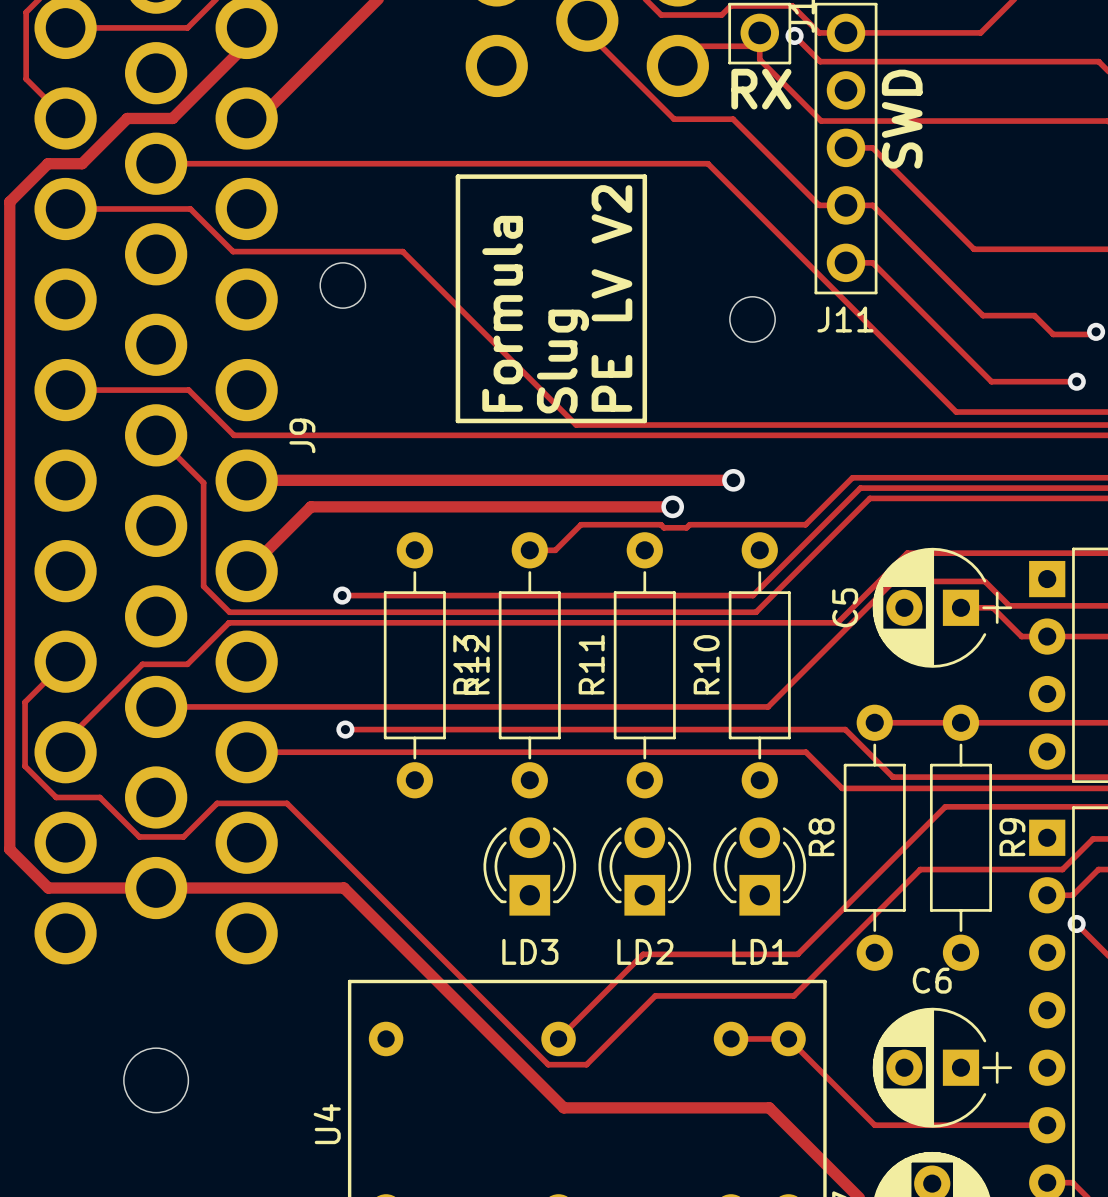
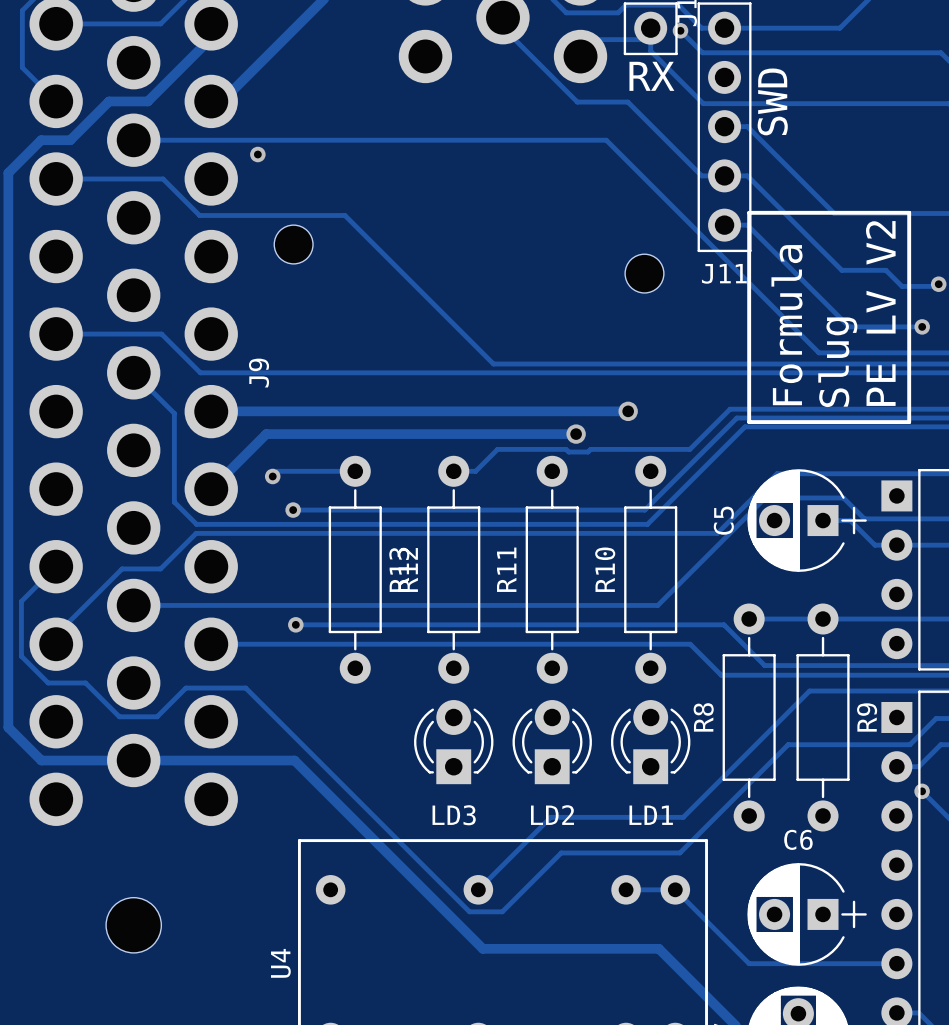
line: (457, 176) (644, 176) (644, 420) (457, 420) (457, 176) -> (749, 212) (909, 212) (909, 422) (749, 422) (749, 212)
via: none -> (257, 154)
text position: PE LV V2 (611, 298) -> PE LV V2 (880, 313)
text position: Formula (502, 313) -> Formula (786, 325)
text position: Slug (562, 361) -> Slug (837, 362)
track: none -> (355, 471) (277, 471) (272, 476)
via: none -> (272, 476)

